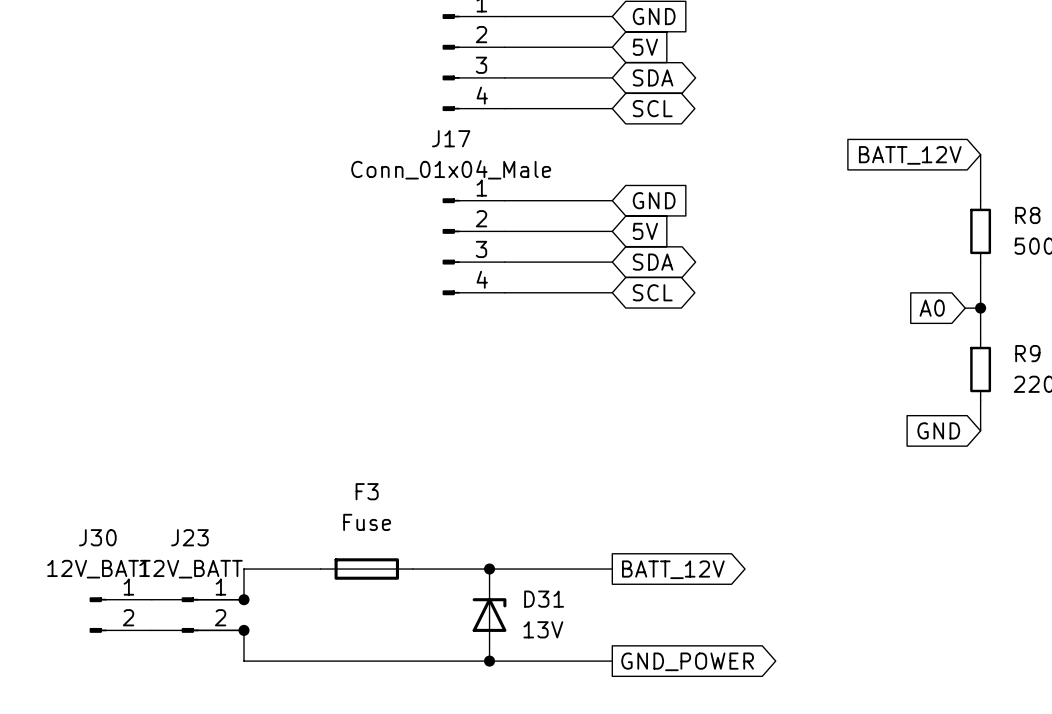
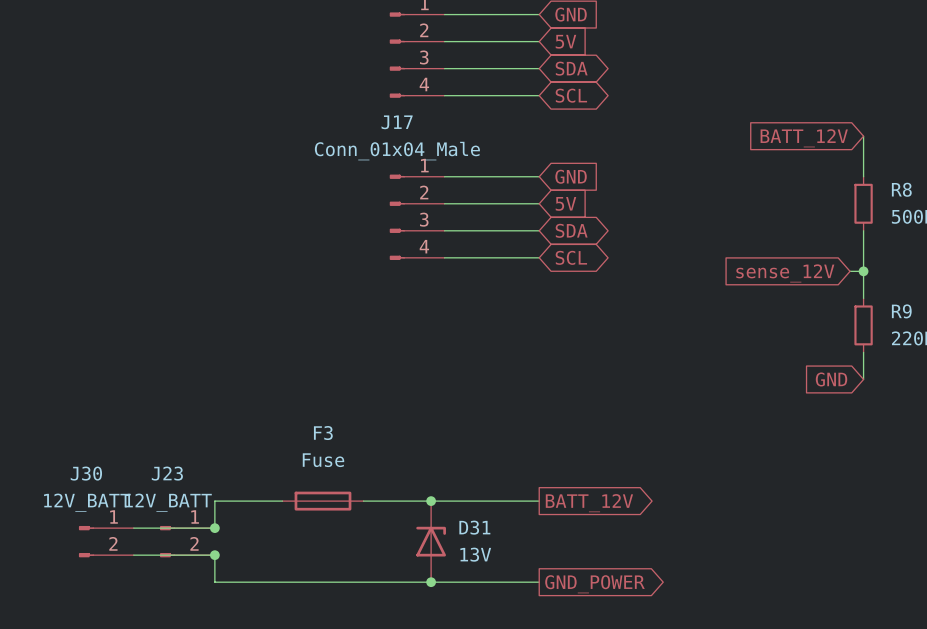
global label: A0 (932, 308) -> sense_12V (785, 273)

